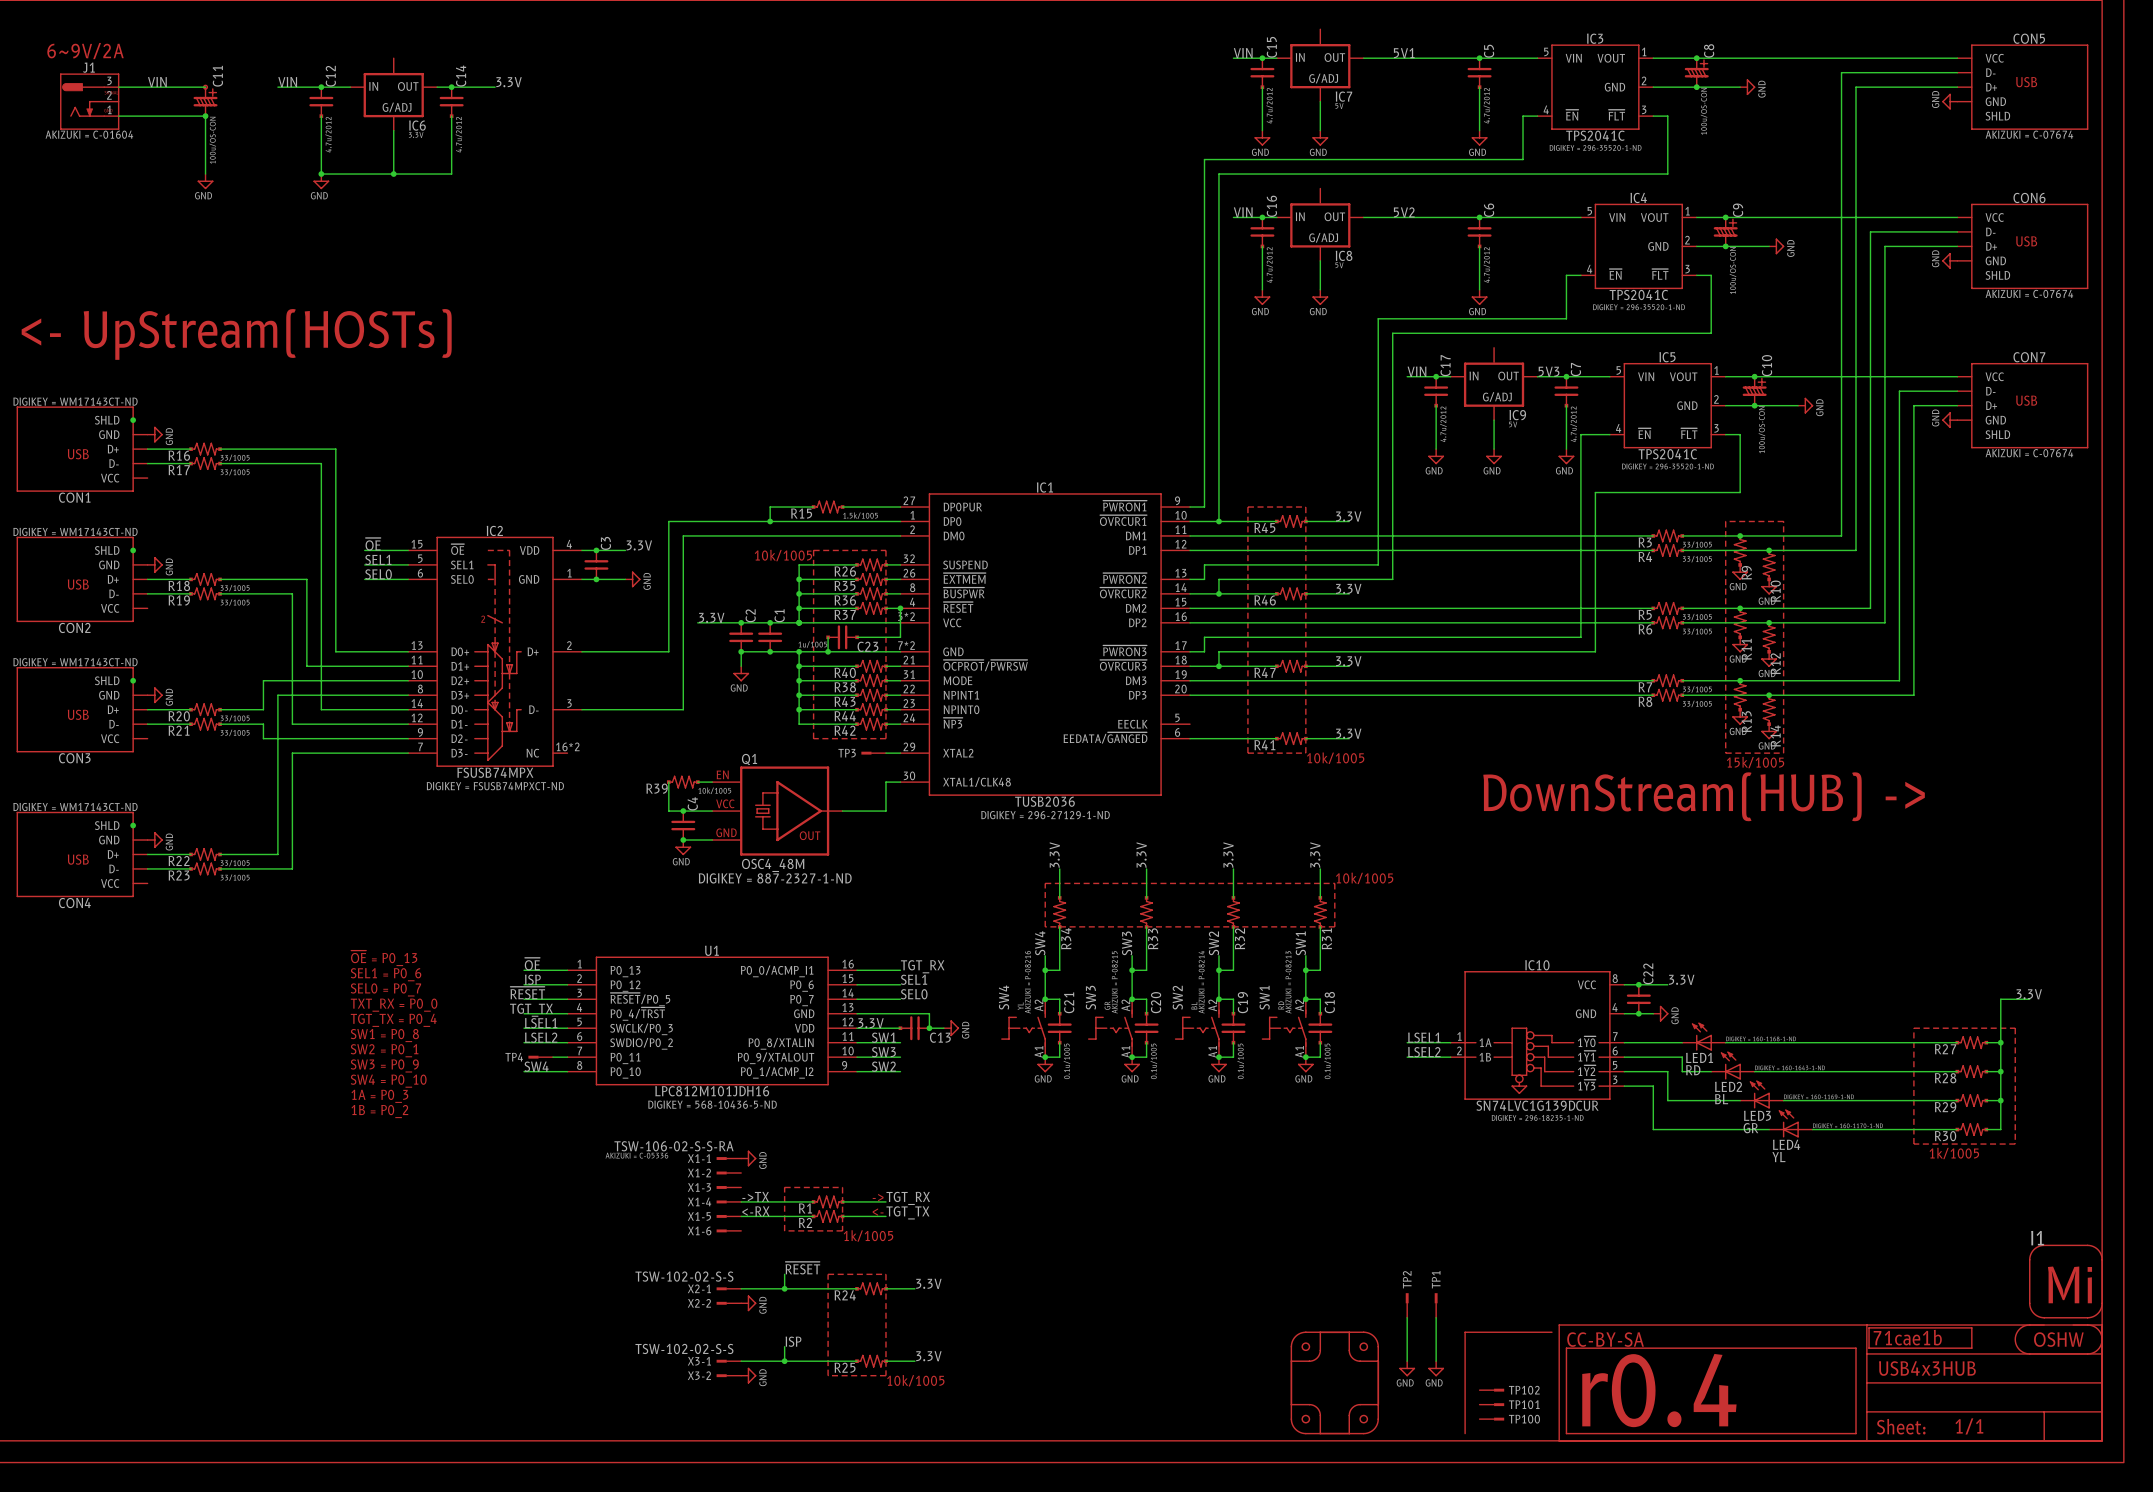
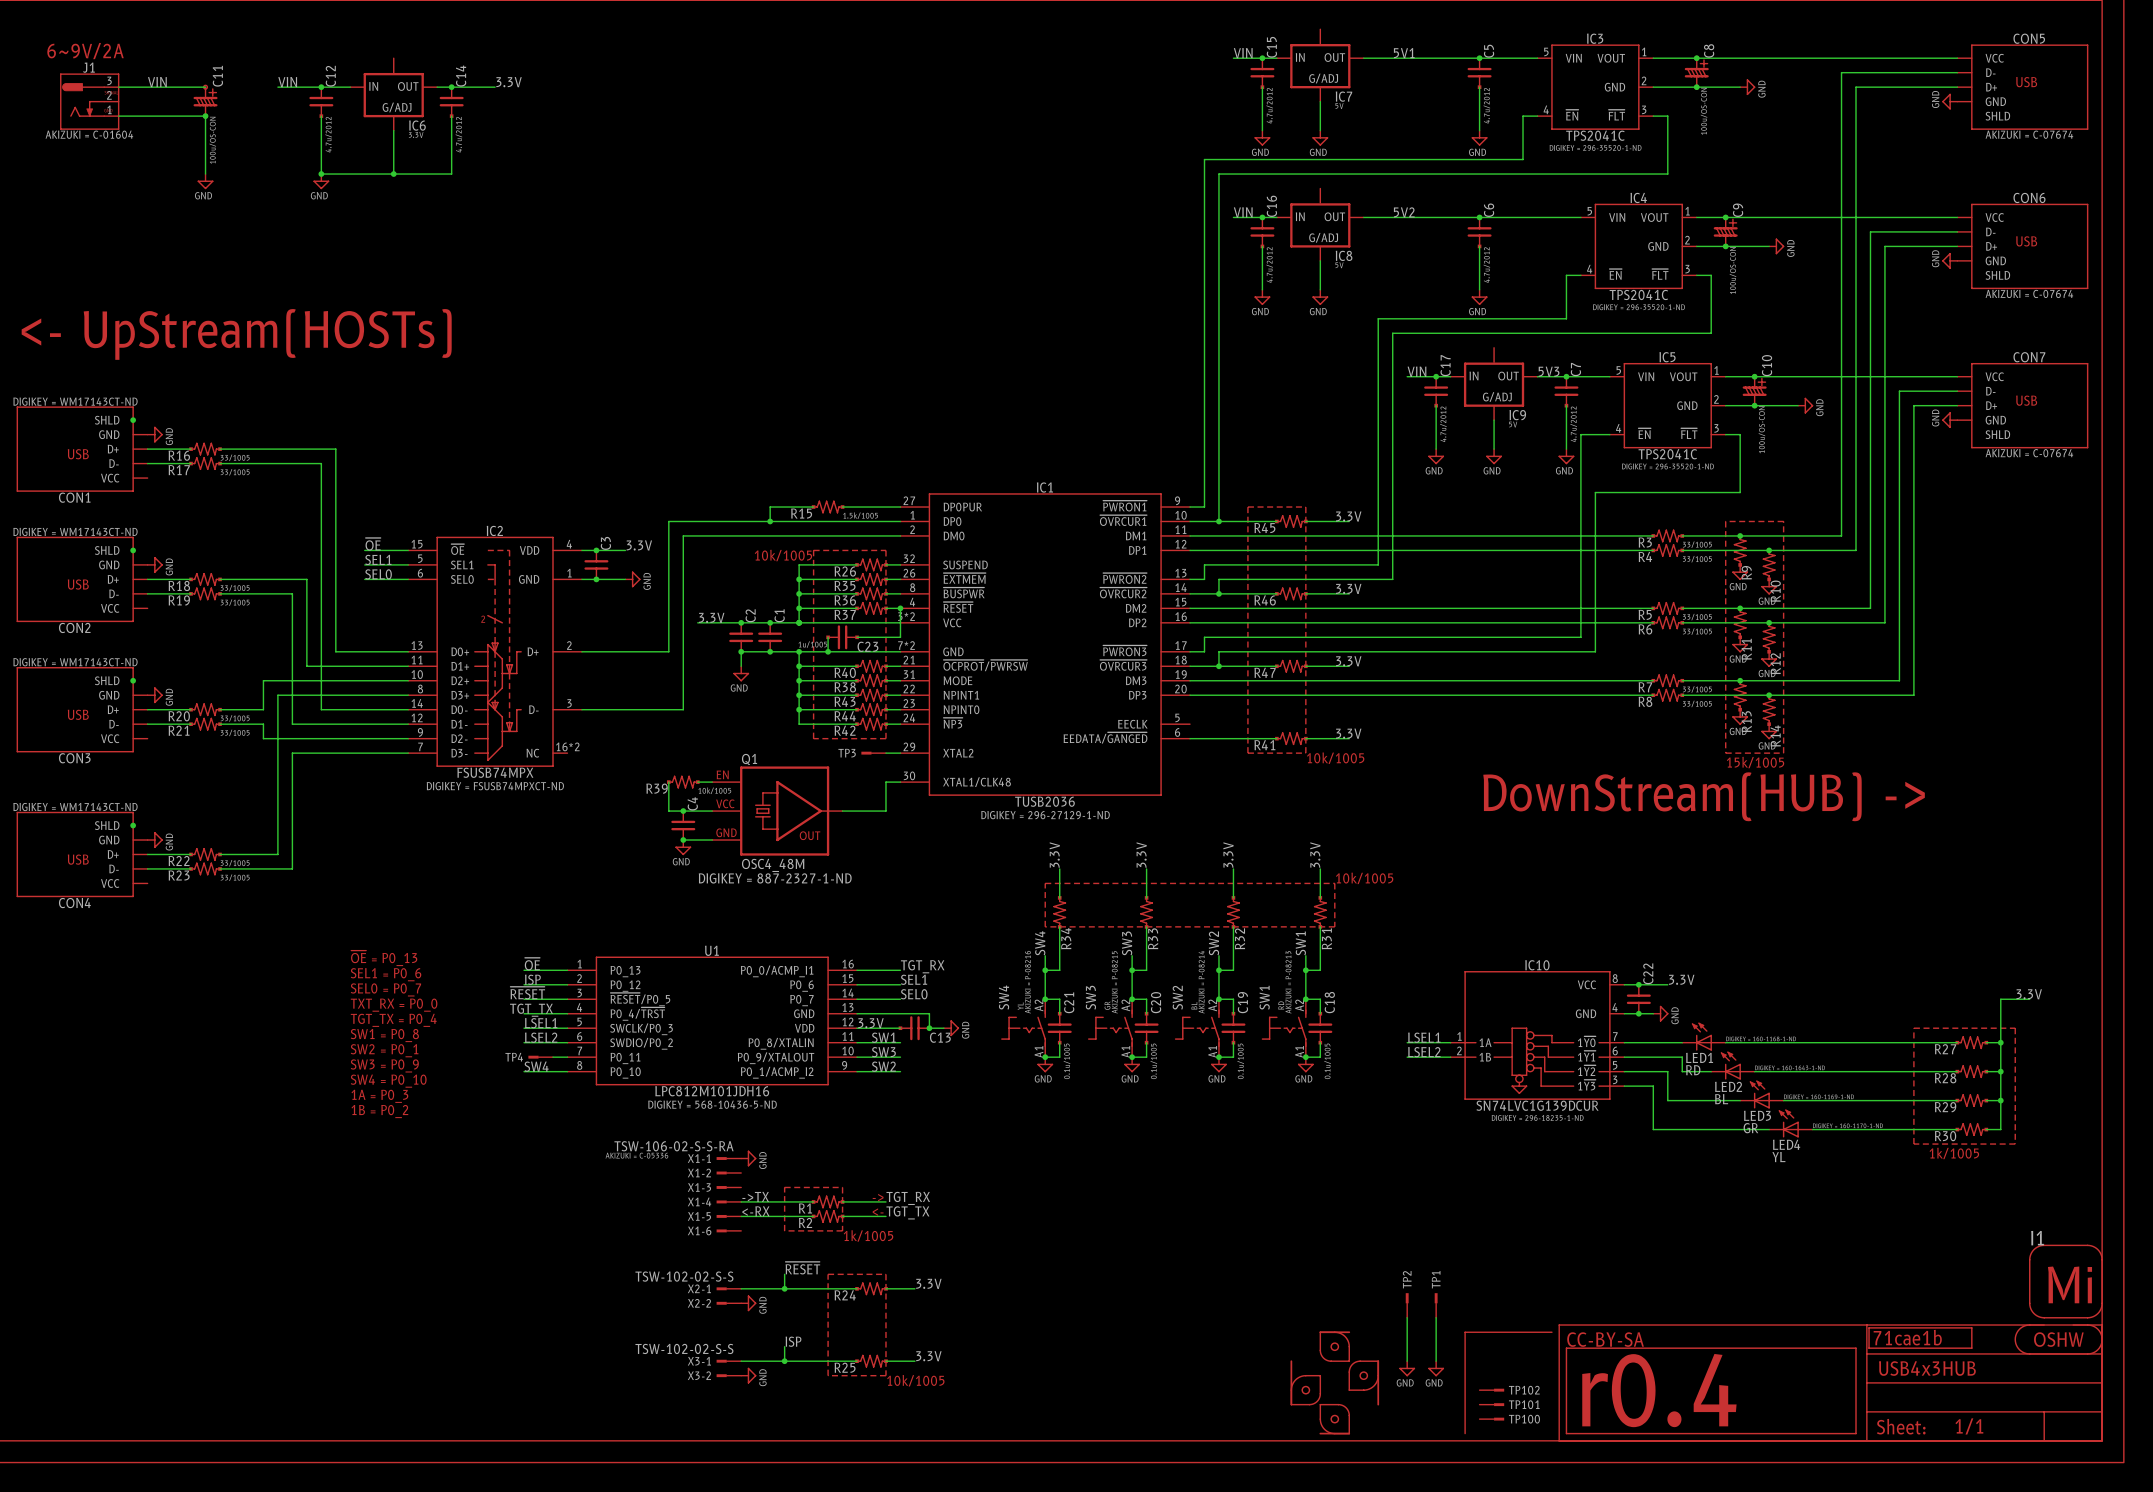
part: (1305, 1346) -> none
part: none -> (1334, 1346)
part: (1363, 1346) -> none
part: none -> (1363, 1375)
part: none -> (1305, 1390)
part: (1305, 1419) -> none
part: none -> (1334, 1419)
part: (1363, 1419) -> none

